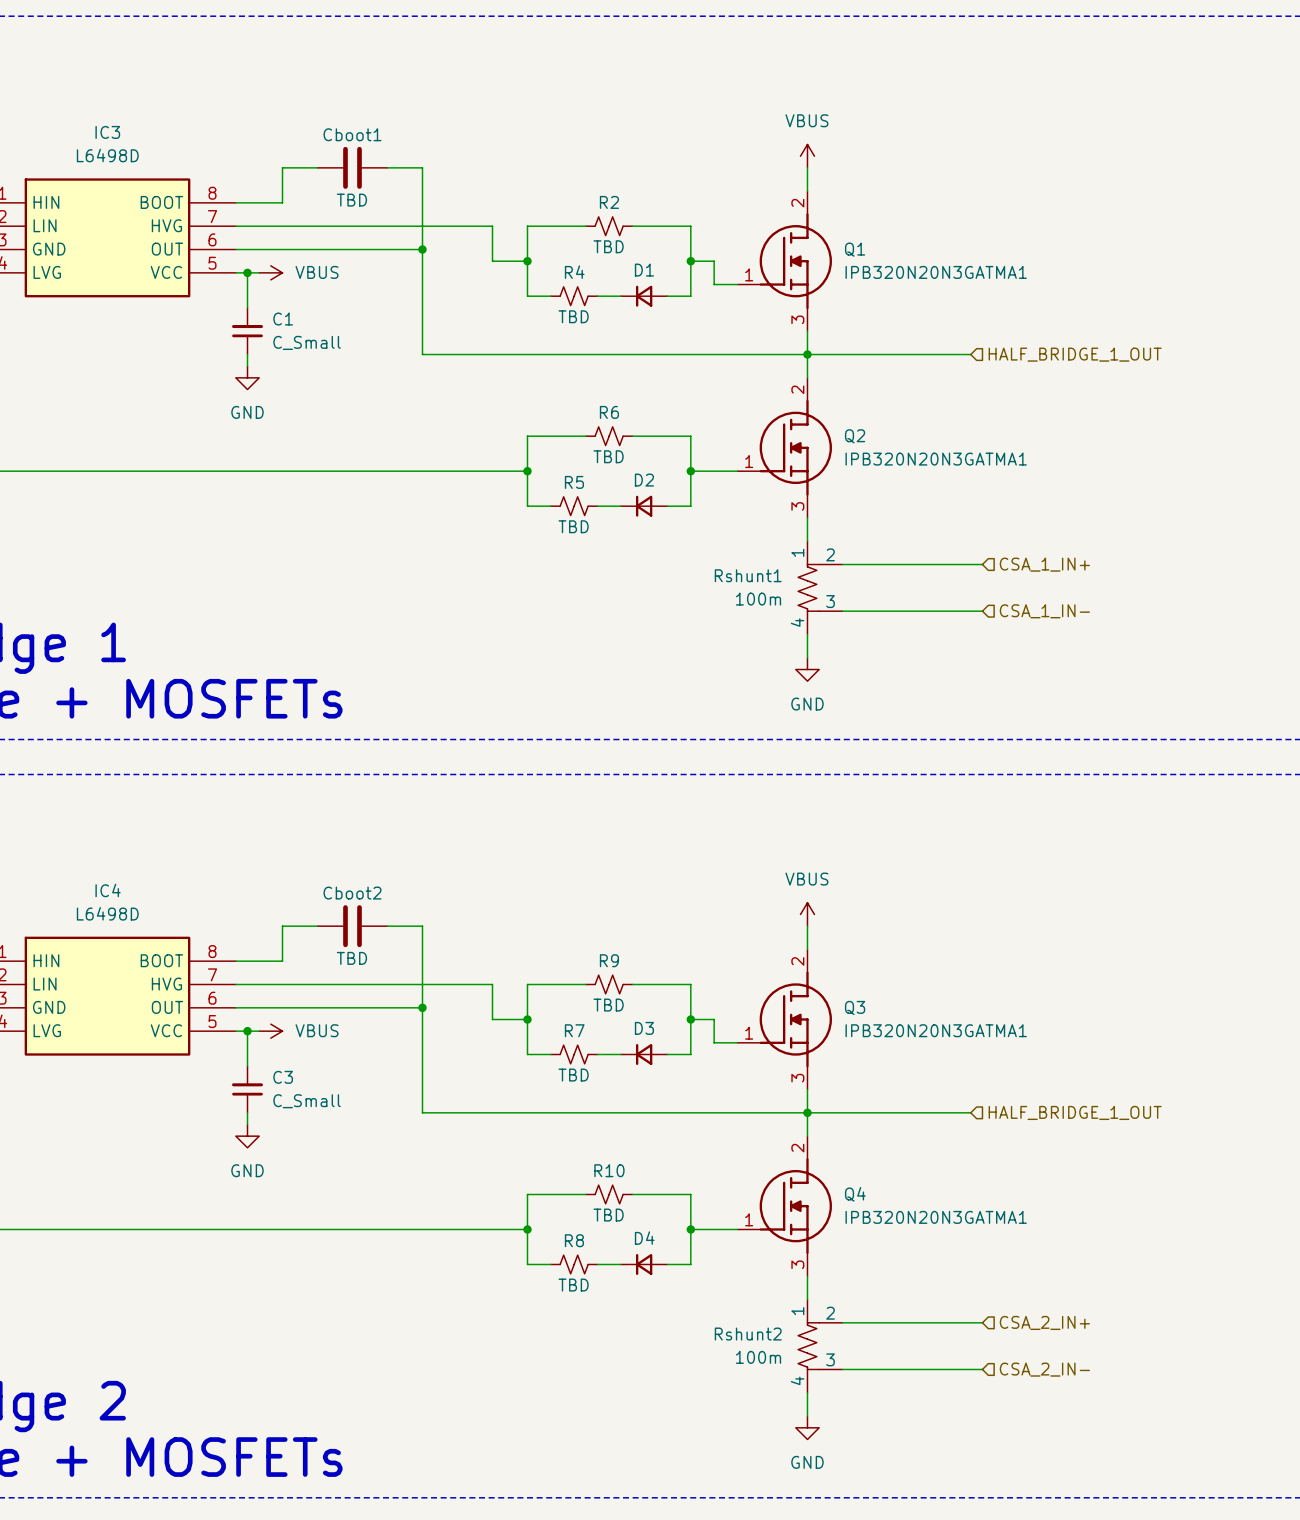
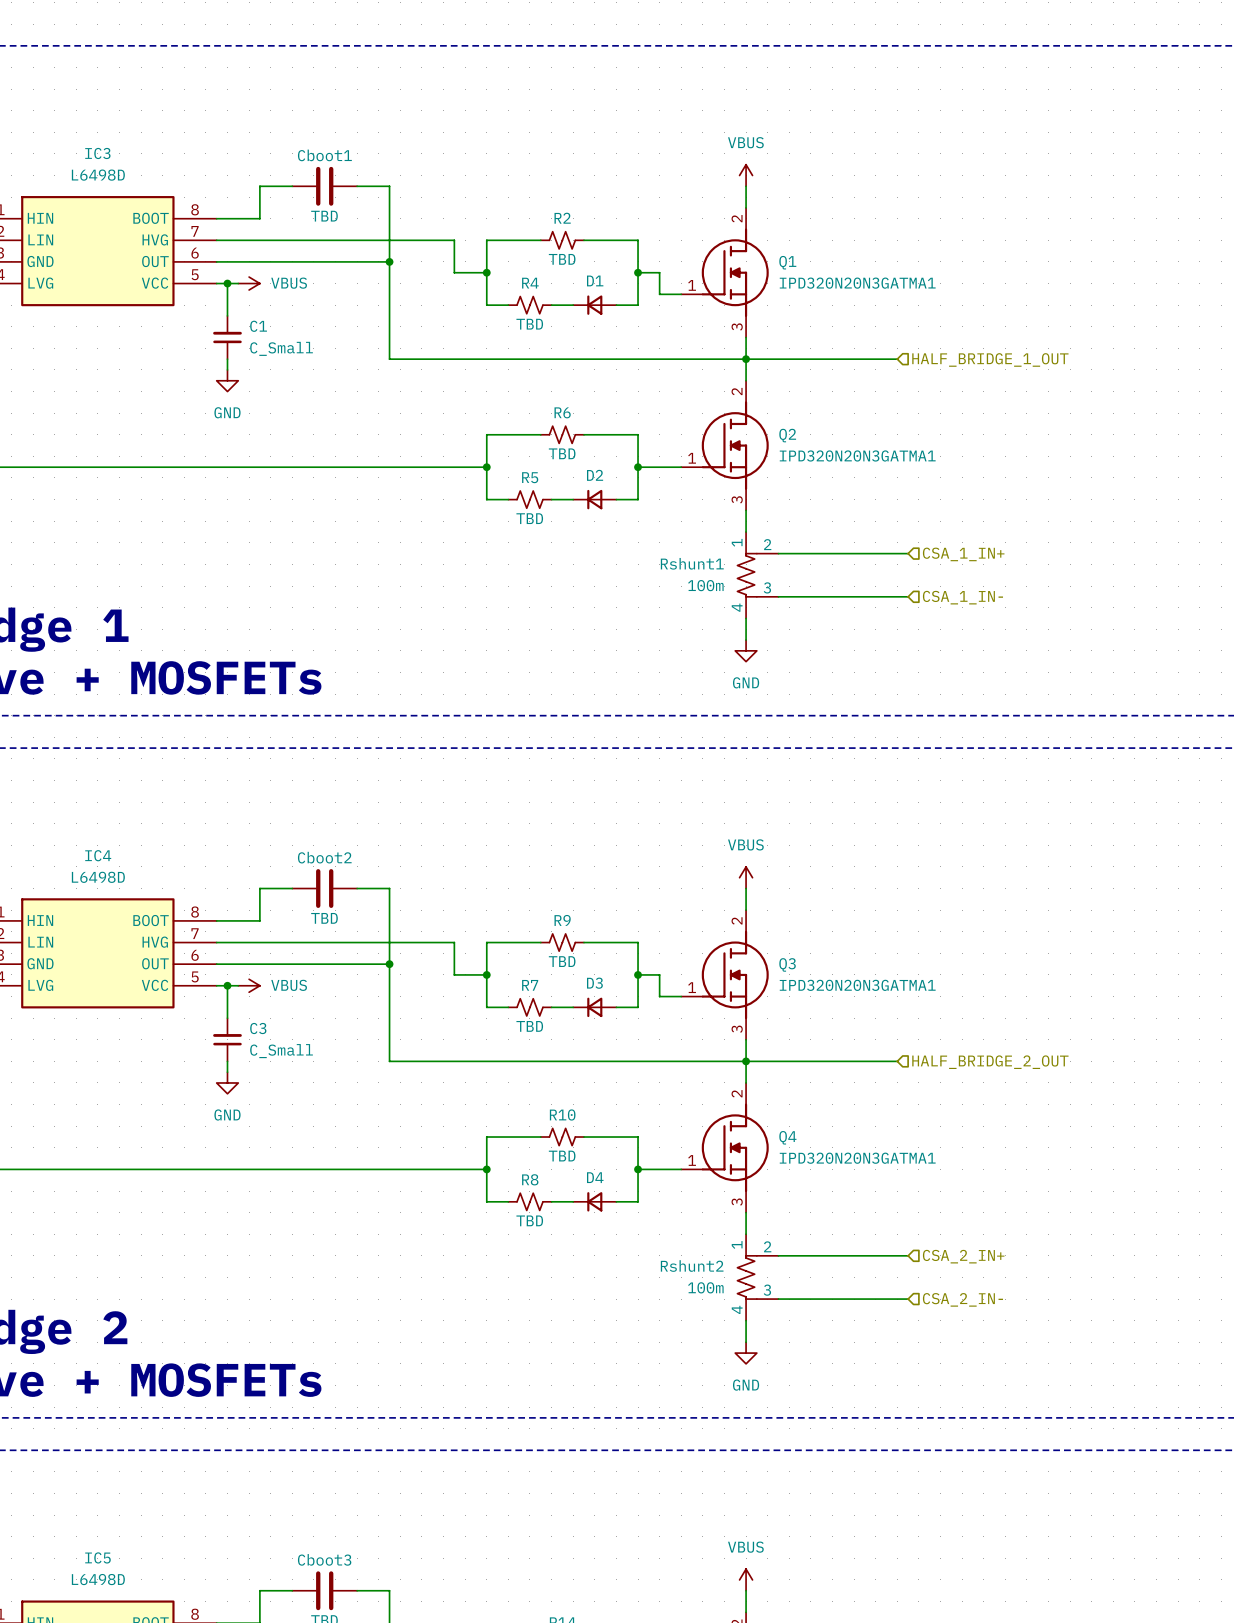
Q1 value: IPB320N20N3GATMA1 (936, 272) -> IPD320N20N3GATMA1 (857, 283)
Q2 value: IPB320N20N3GATMA1 (936, 459) -> IPD320N20N3GATMA1 (857, 455)
Q3 value: IPB320N20N3GATMA1 (936, 1030) -> IPD320N20N3GATMA1 (857, 985)
hierarchical label: HALF_BRIDGE_1_OUT (1075, 1112) -> HALF_BRIDGE_2_OUT (990, 1062)
Q4 value: IPB320N20N3GATMA1 (936, 1217) -> IPD320N20N3GATMA1 (857, 1158)

